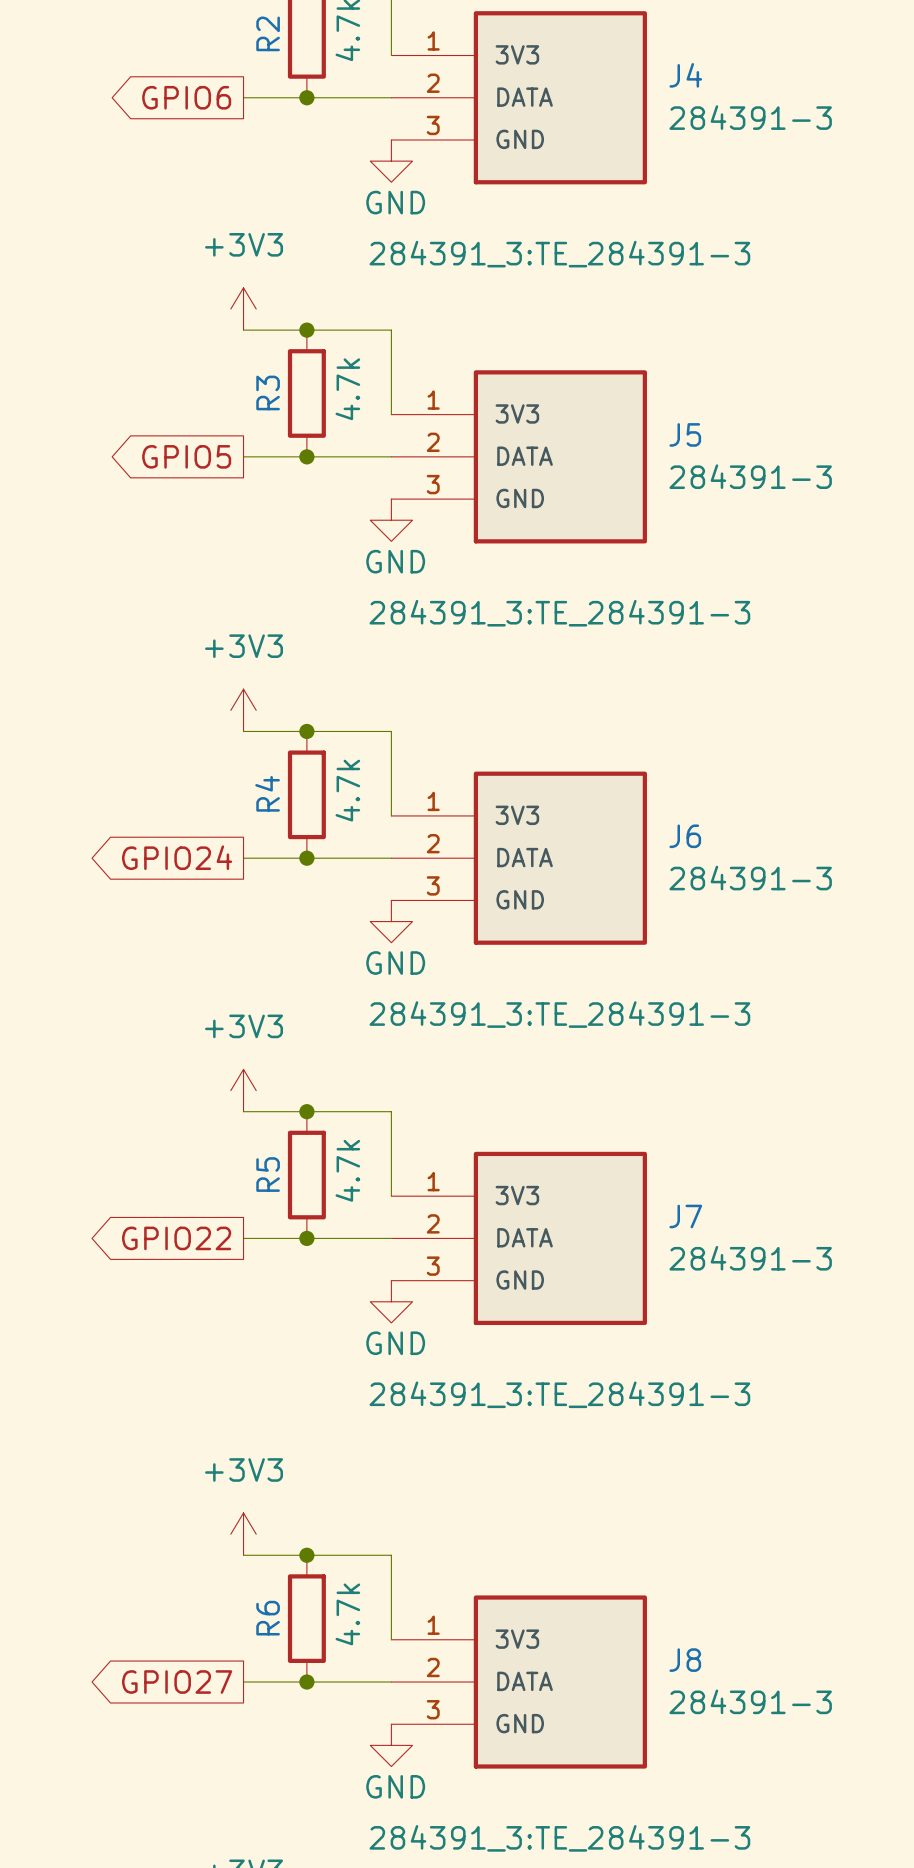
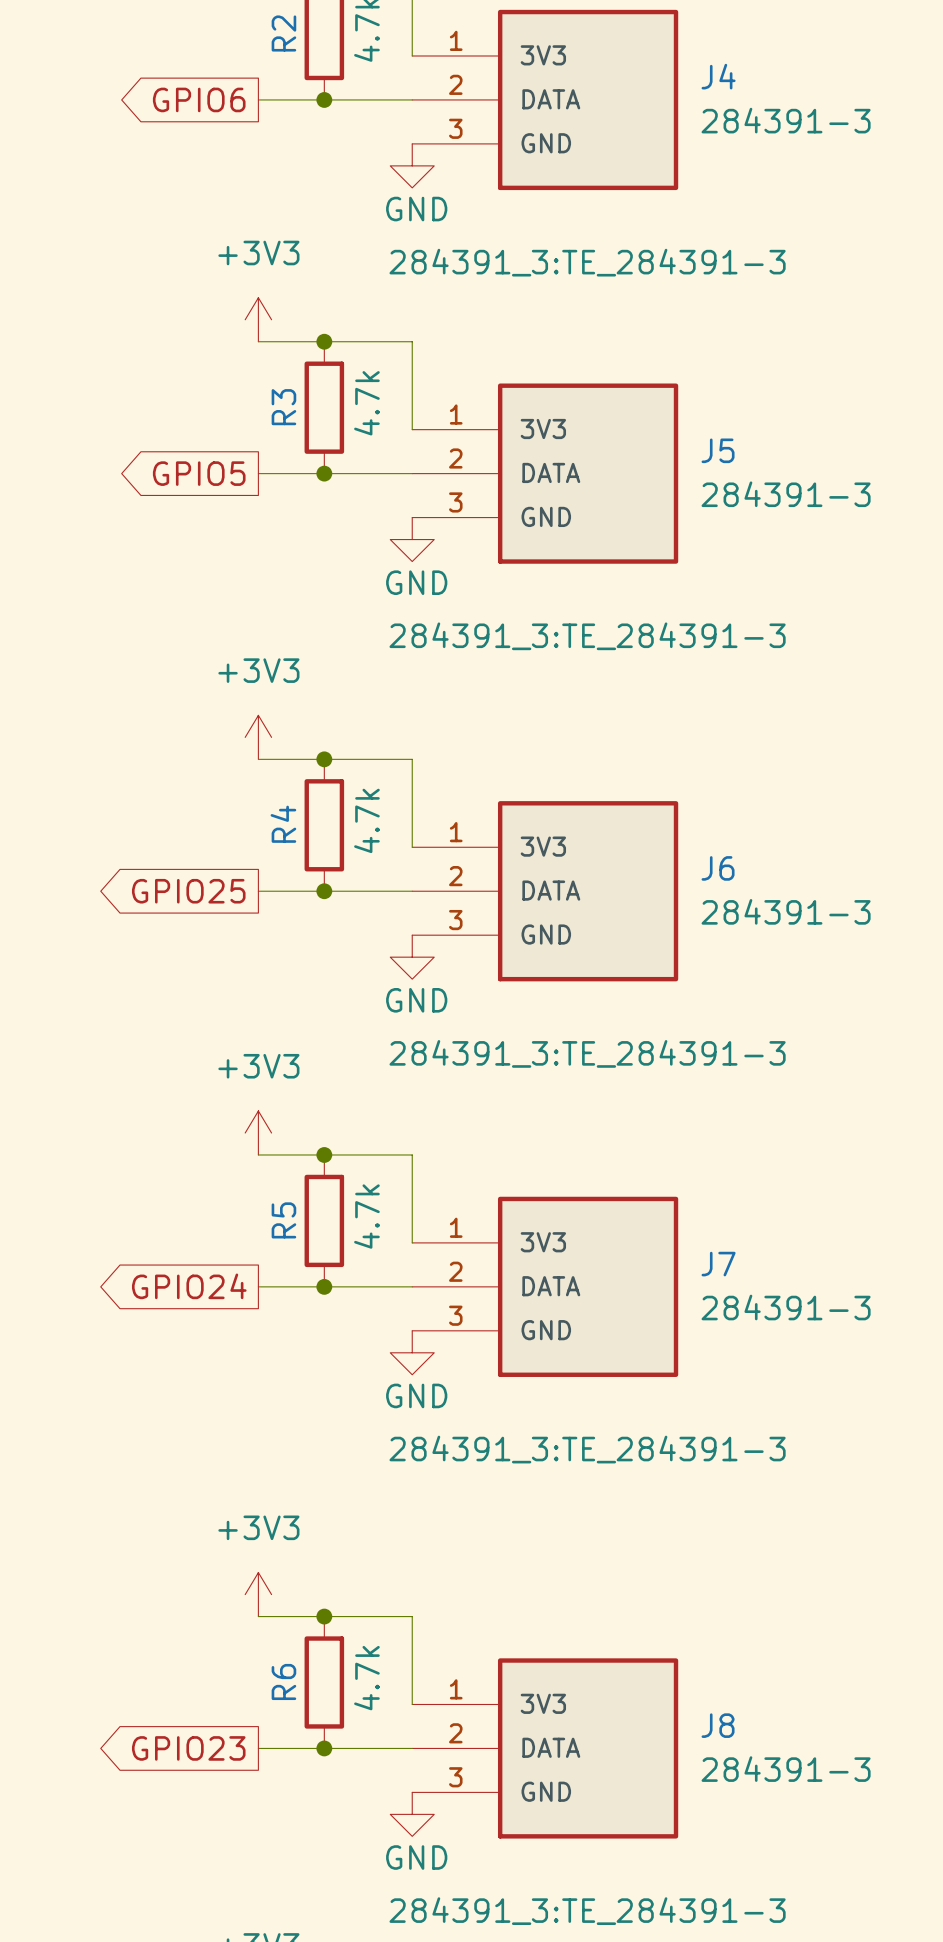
global label: GPIO24 (177, 857) -> GPIO25 (188, 891)
global label: GPIO22 (176, 1238) -> GPIO24 (189, 1286)
global label: GPIO27 (177, 1682) -> GPIO23 (188, 1748)

